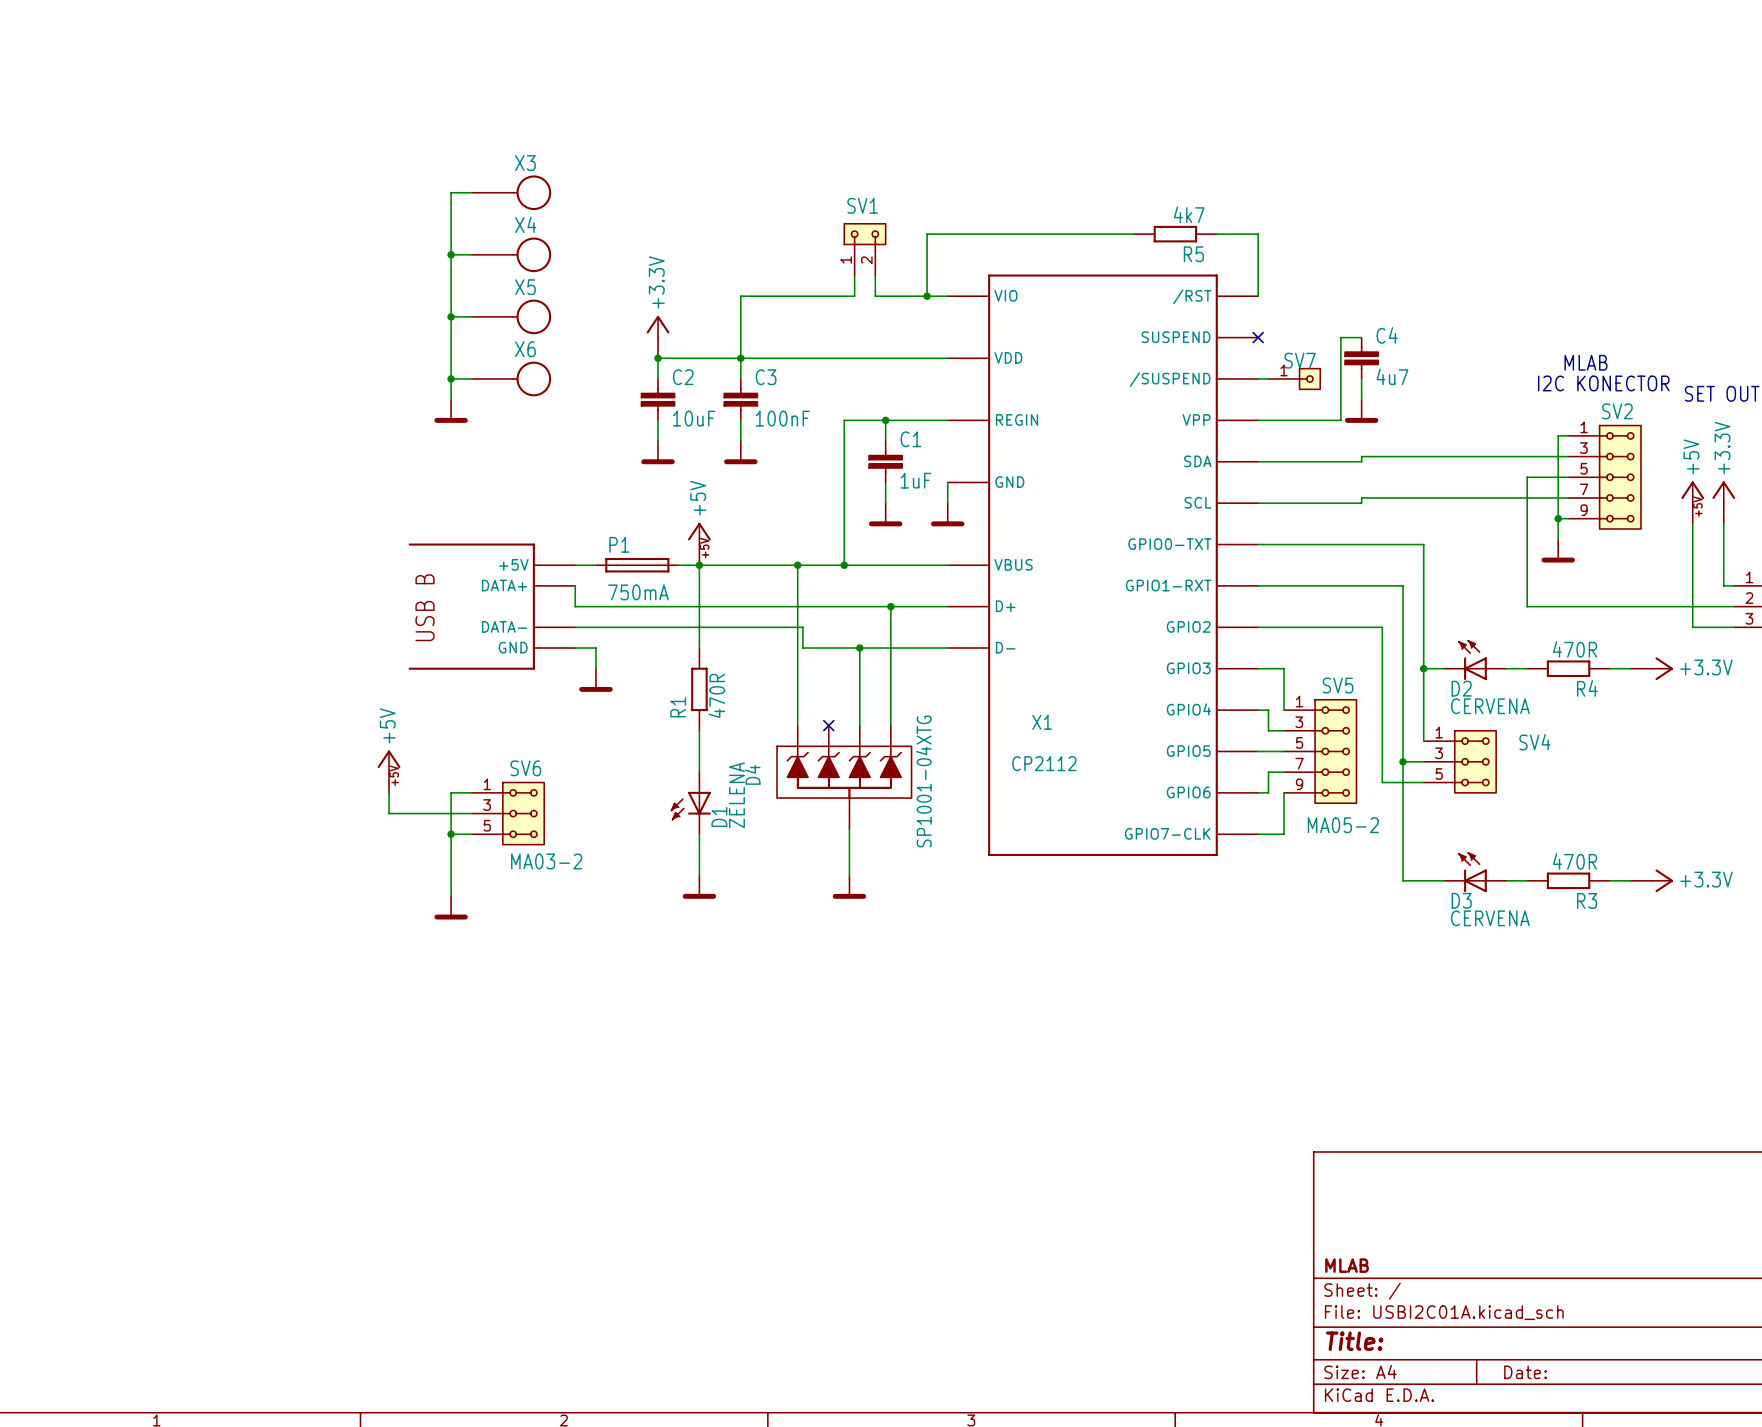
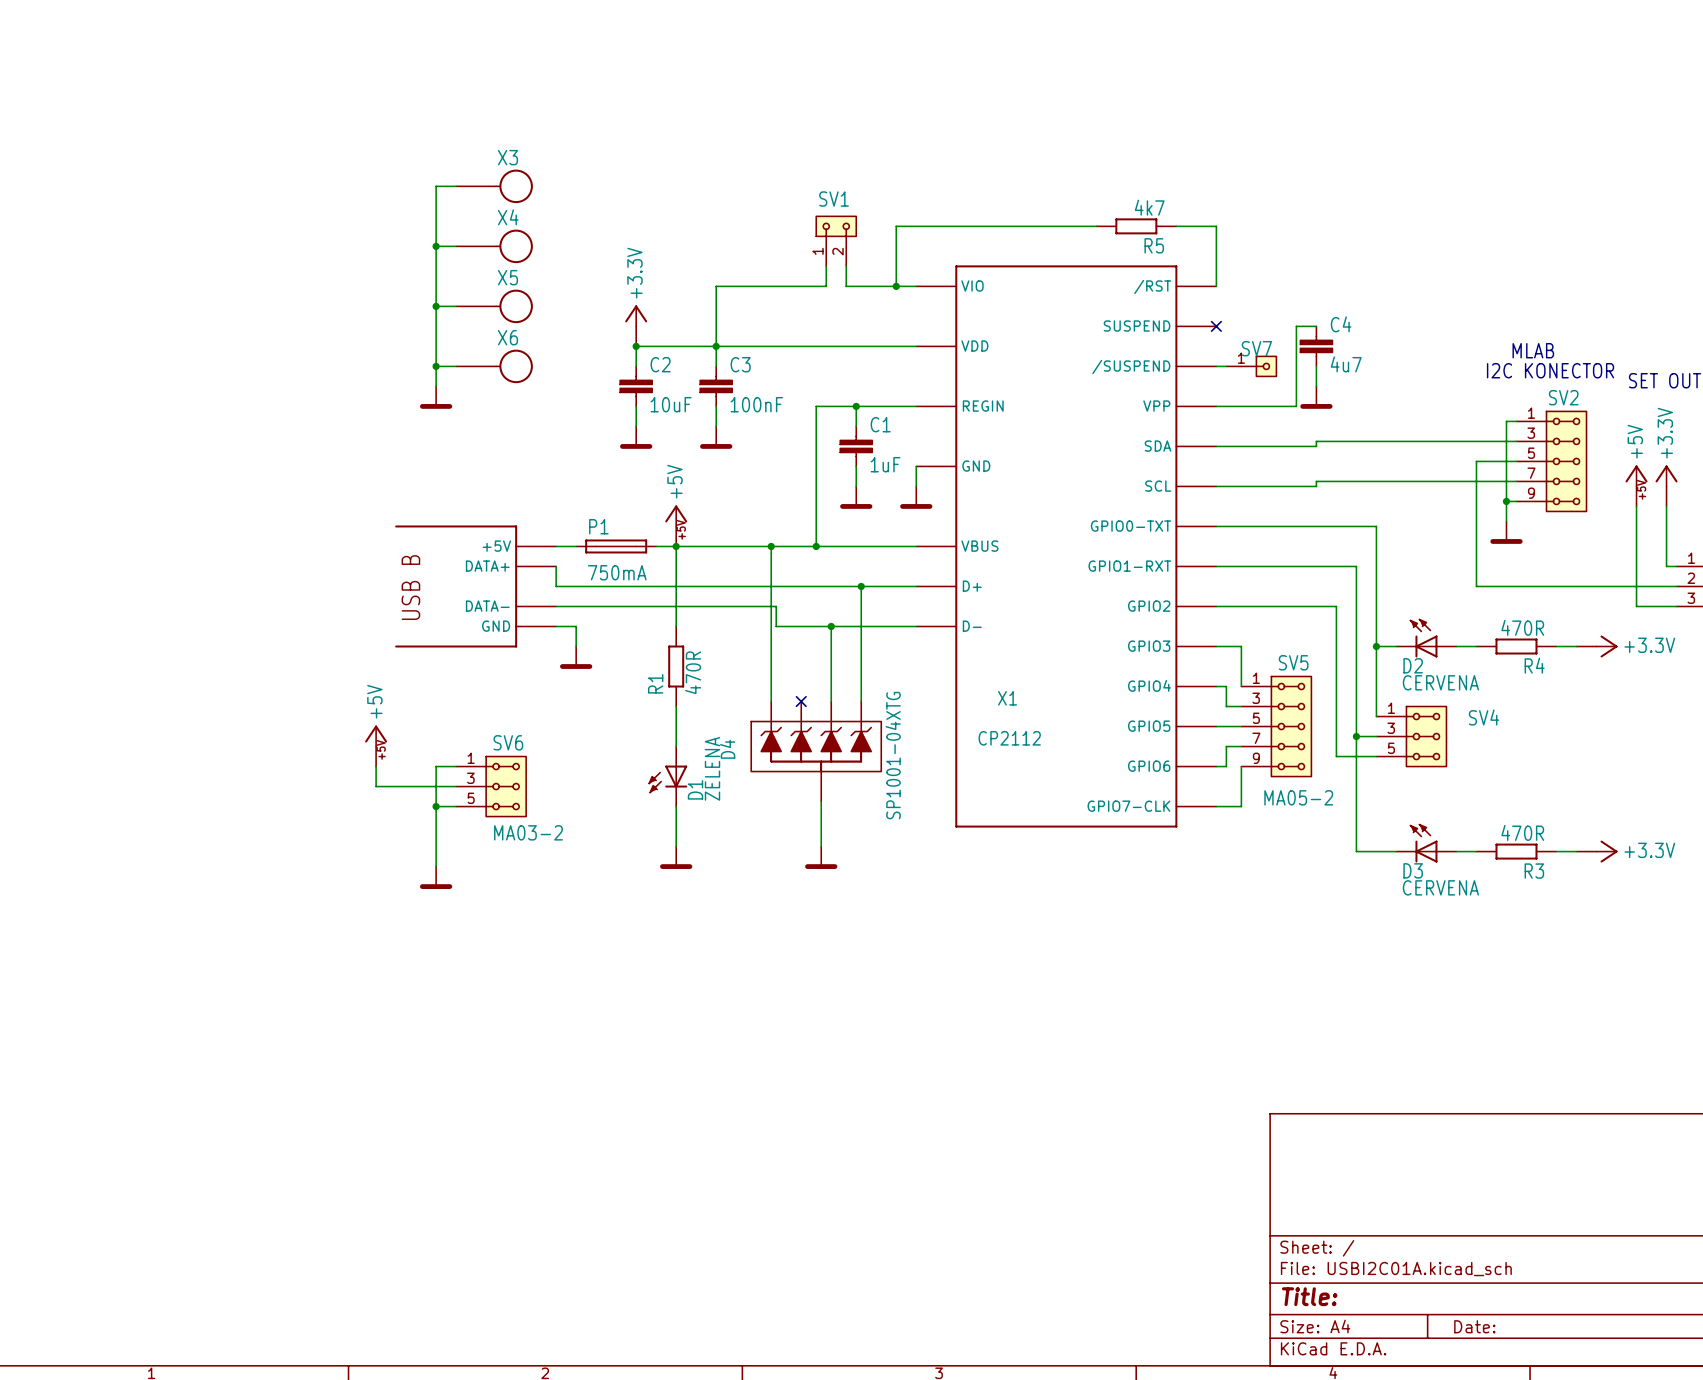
title block: MLAB (1347, 1265) -> none

